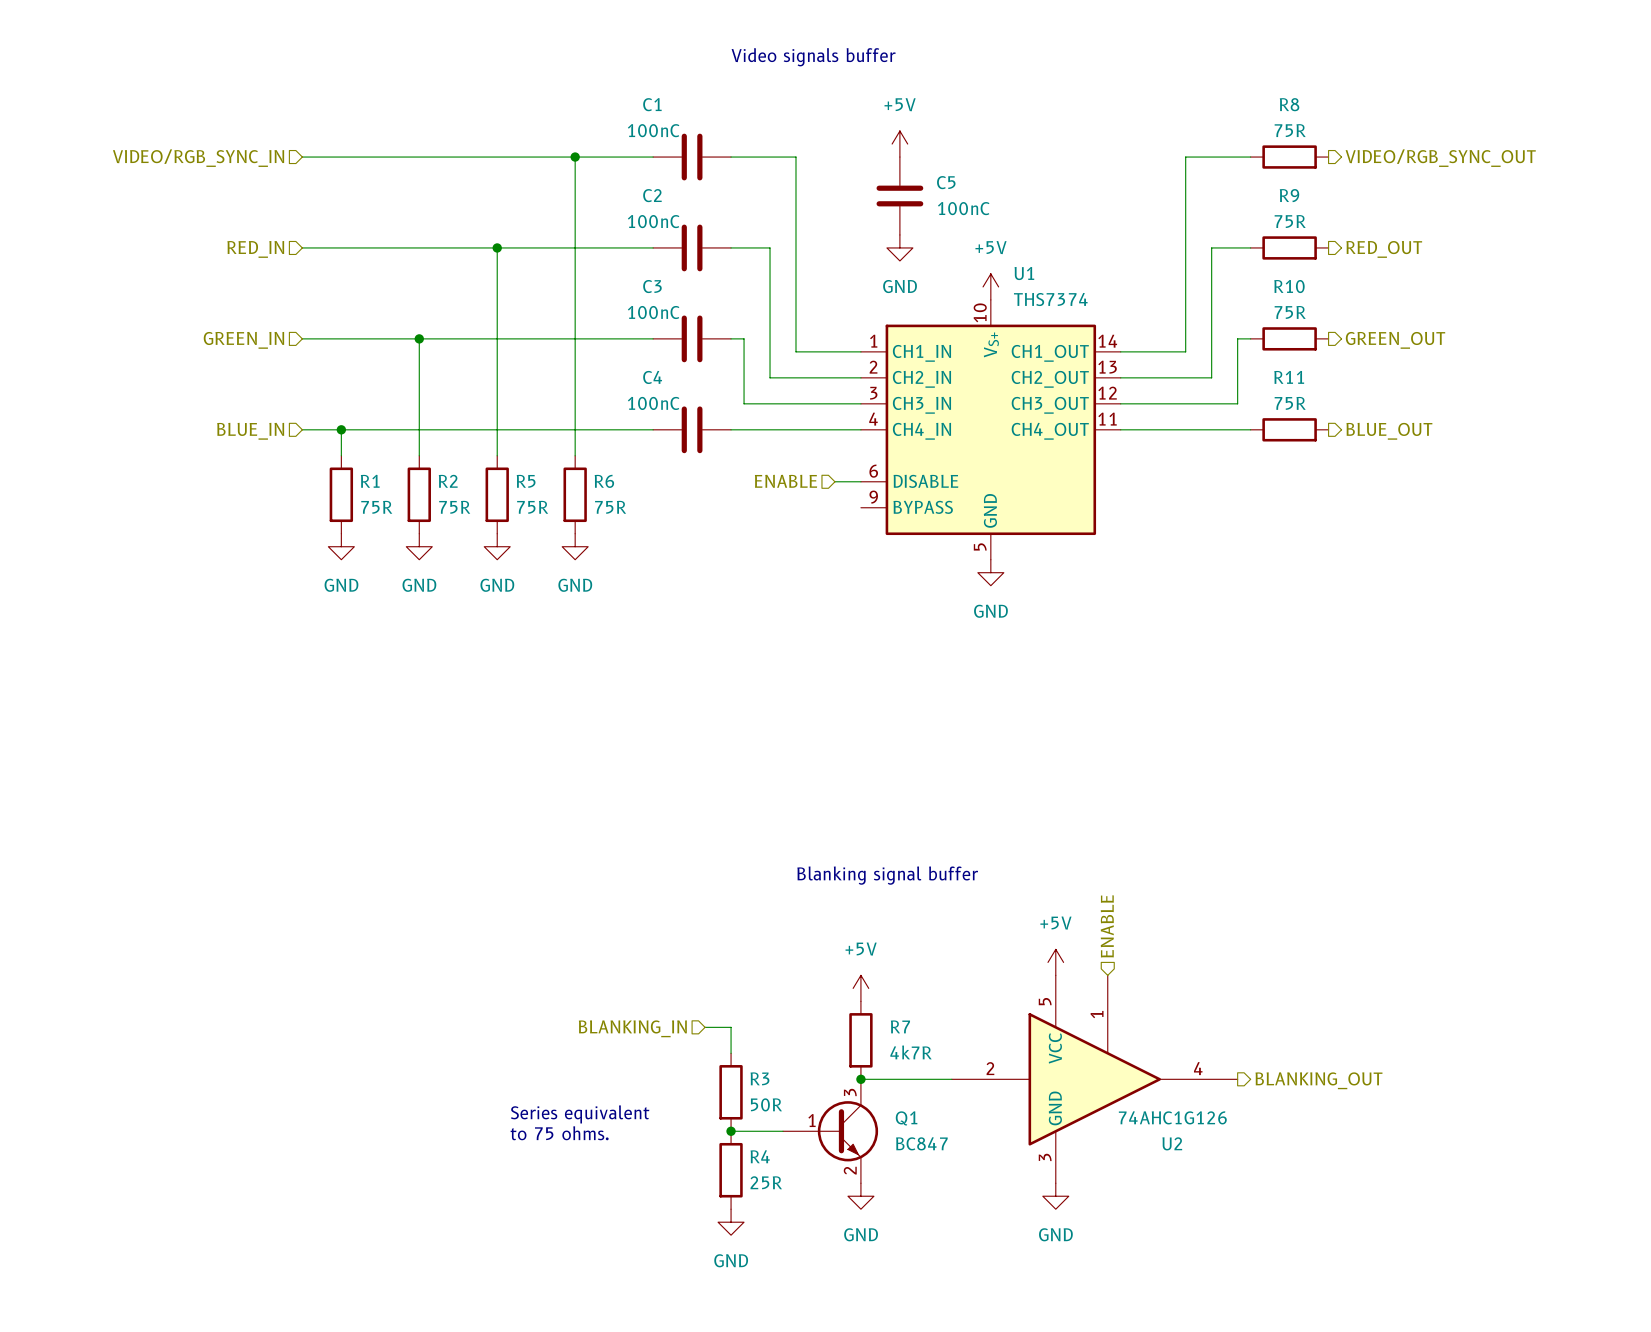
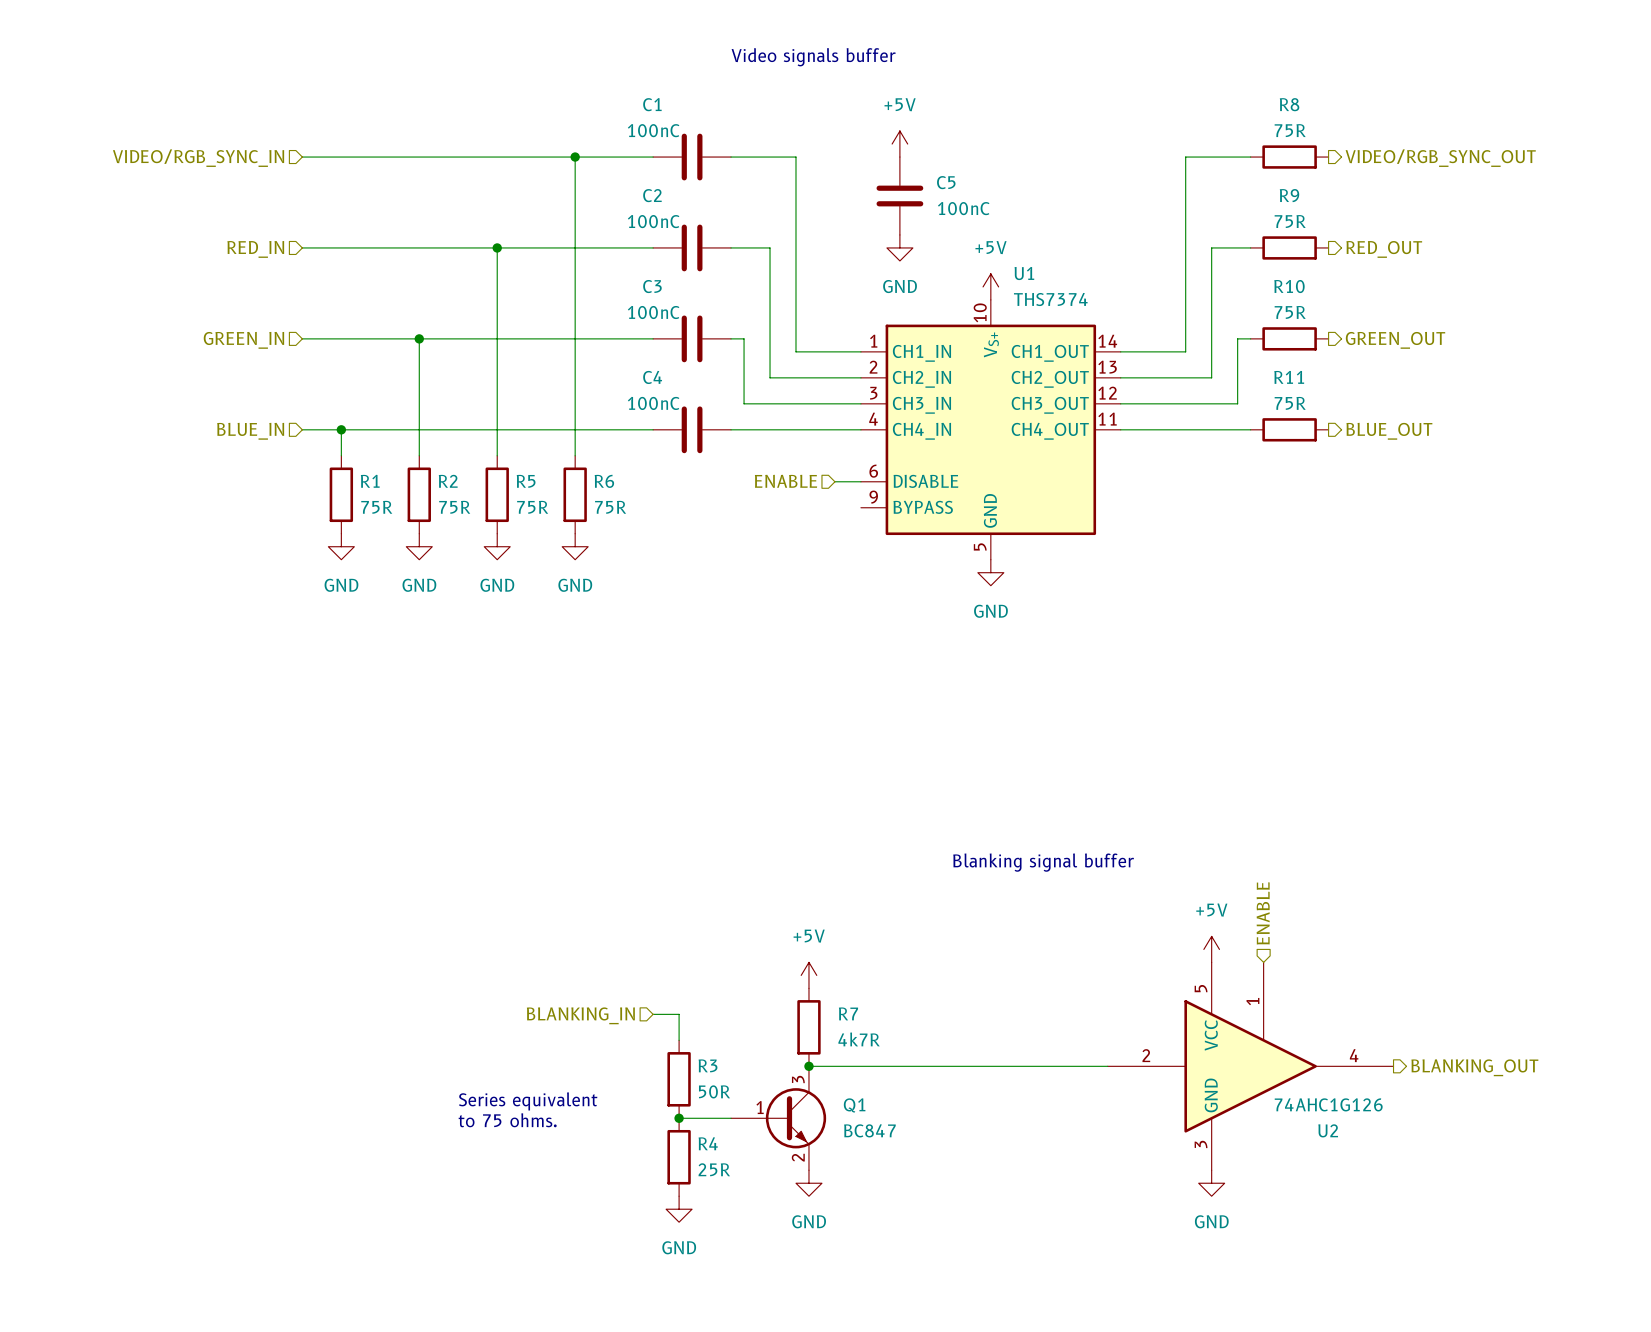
text position: Blanking signal buffer (887, 875) -> Blanking signal buffer (1043, 862)
hierarchical label position: ENABLE (1107, 926) -> ENABLE (1263, 913)
power symbol: none -> +5V (1211, 949)
power symbol: +5V (1055, 962) -> none
power symbol position: +5V (860, 988) -> +5V (808, 975)
wire: (705, 1027) (731, 1027) (731, 1053) -> (653, 1014) (679, 1014) (679, 1040)
hierarchical label position: BLANKING_IN (632, 1028) -> BLANKING_IN (580, 1015)
R7 position: (860, 1040) -> (808, 1027)
wire: none -> (808, 1066) (1107, 1066)
junction: none -> (808, 1066)
wire: (860, 1079) (951, 1079) -> none
junction: (860, 1079) -> none
U2 position: (1094, 1079) -> (1250, 1066)
hierarchical label position: BLANKING_OUT (1318, 1080) -> BLANKING_OUT (1474, 1067)
R3 position: (731, 1092) -> (679, 1079)
text position: Series equivalent (580, 1114) -> Series equivalent (528, 1101)
junction: none -> (679, 1118)
wire: (731, 1131) (783, 1131) -> (679, 1118) (731, 1118)
junction: (731, 1131) -> none
Q1 position: (830, 1131) -> (778, 1118)
text position: to 75 ohms. (559, 1133) -> to 75 ohms. (507, 1120)
R4 position: (731, 1170) -> (679, 1157)
power symbol: none -> GND (808, 1183)
power symbol: none -> GND (1211, 1183)
power symbol: GND (860, 1196) -> none
power symbol: GND (1055, 1196) -> none
power symbol: none -> GND (679, 1209)
power symbol: GND (731, 1222) -> none

